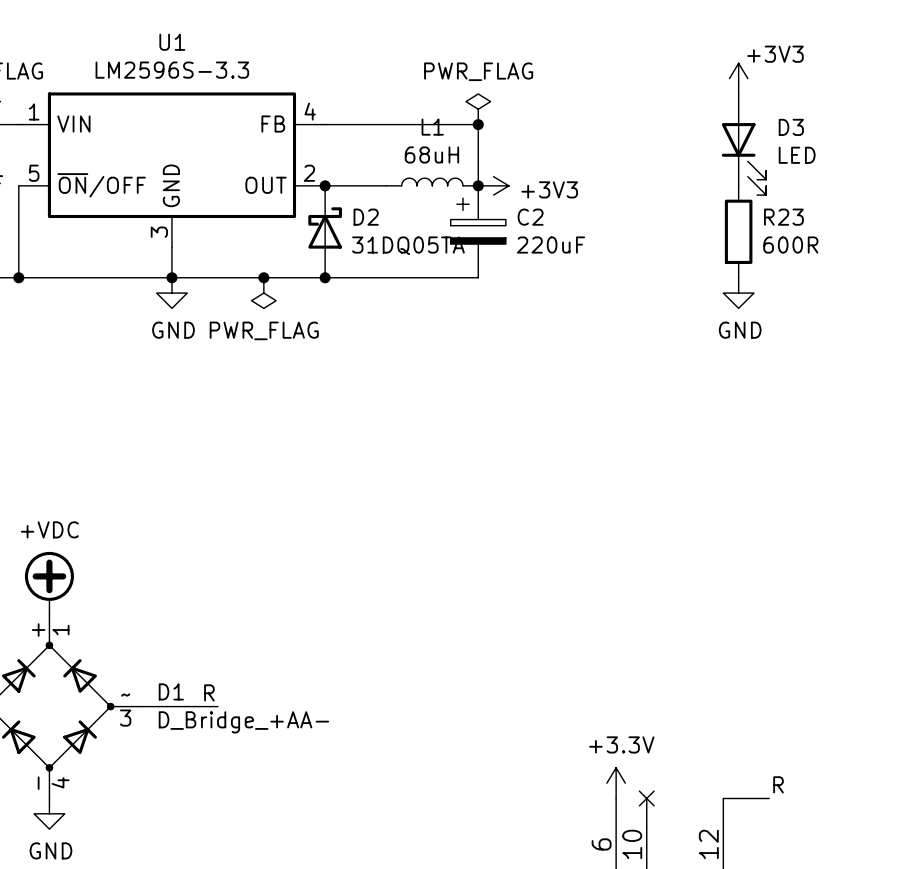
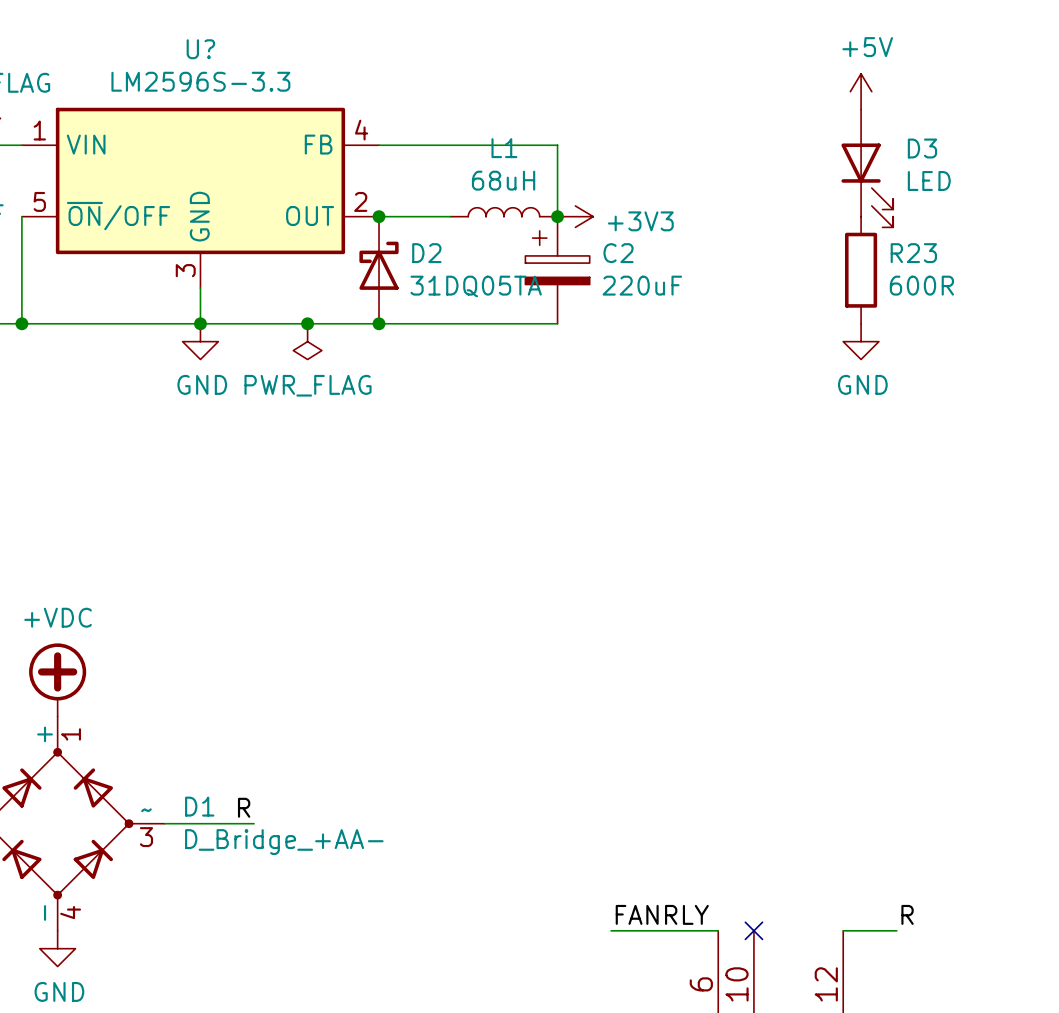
U1 name: U1 (172, 42) -> U? (200, 49)
power symbol: +3V3 (738, 78) -> +5V (861, 91)
power symbol: PWR_FLAG (478, 109) -> none
junction: (478, 124) -> none
power symbol: +3.3V (616, 783) -> none
label: none -> FANRLY (662, 914)
wire: none -> (611, 930) (718, 930)

